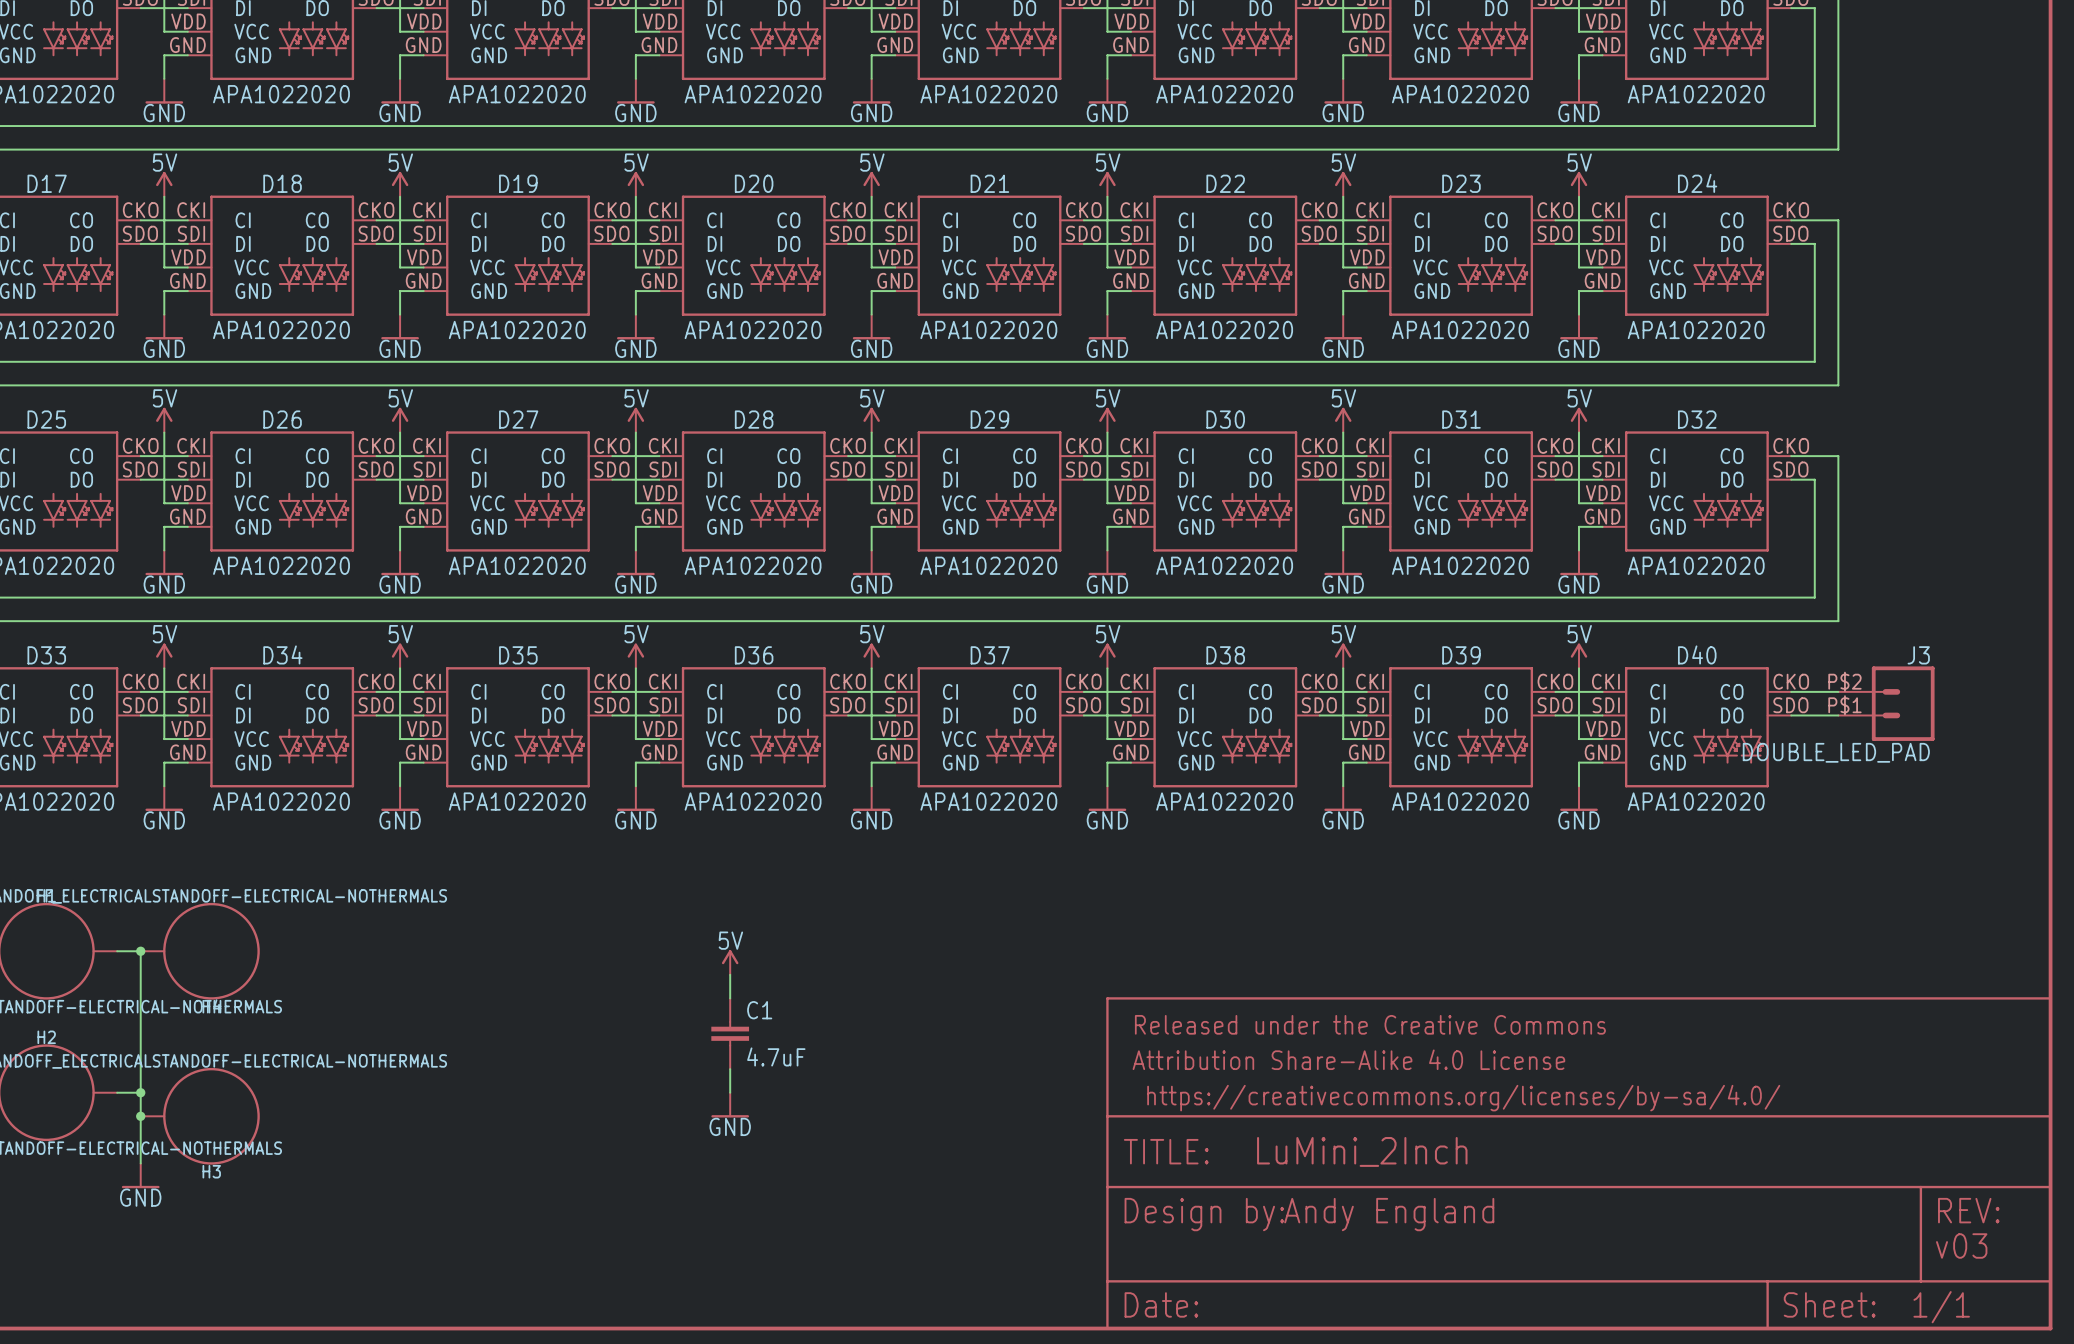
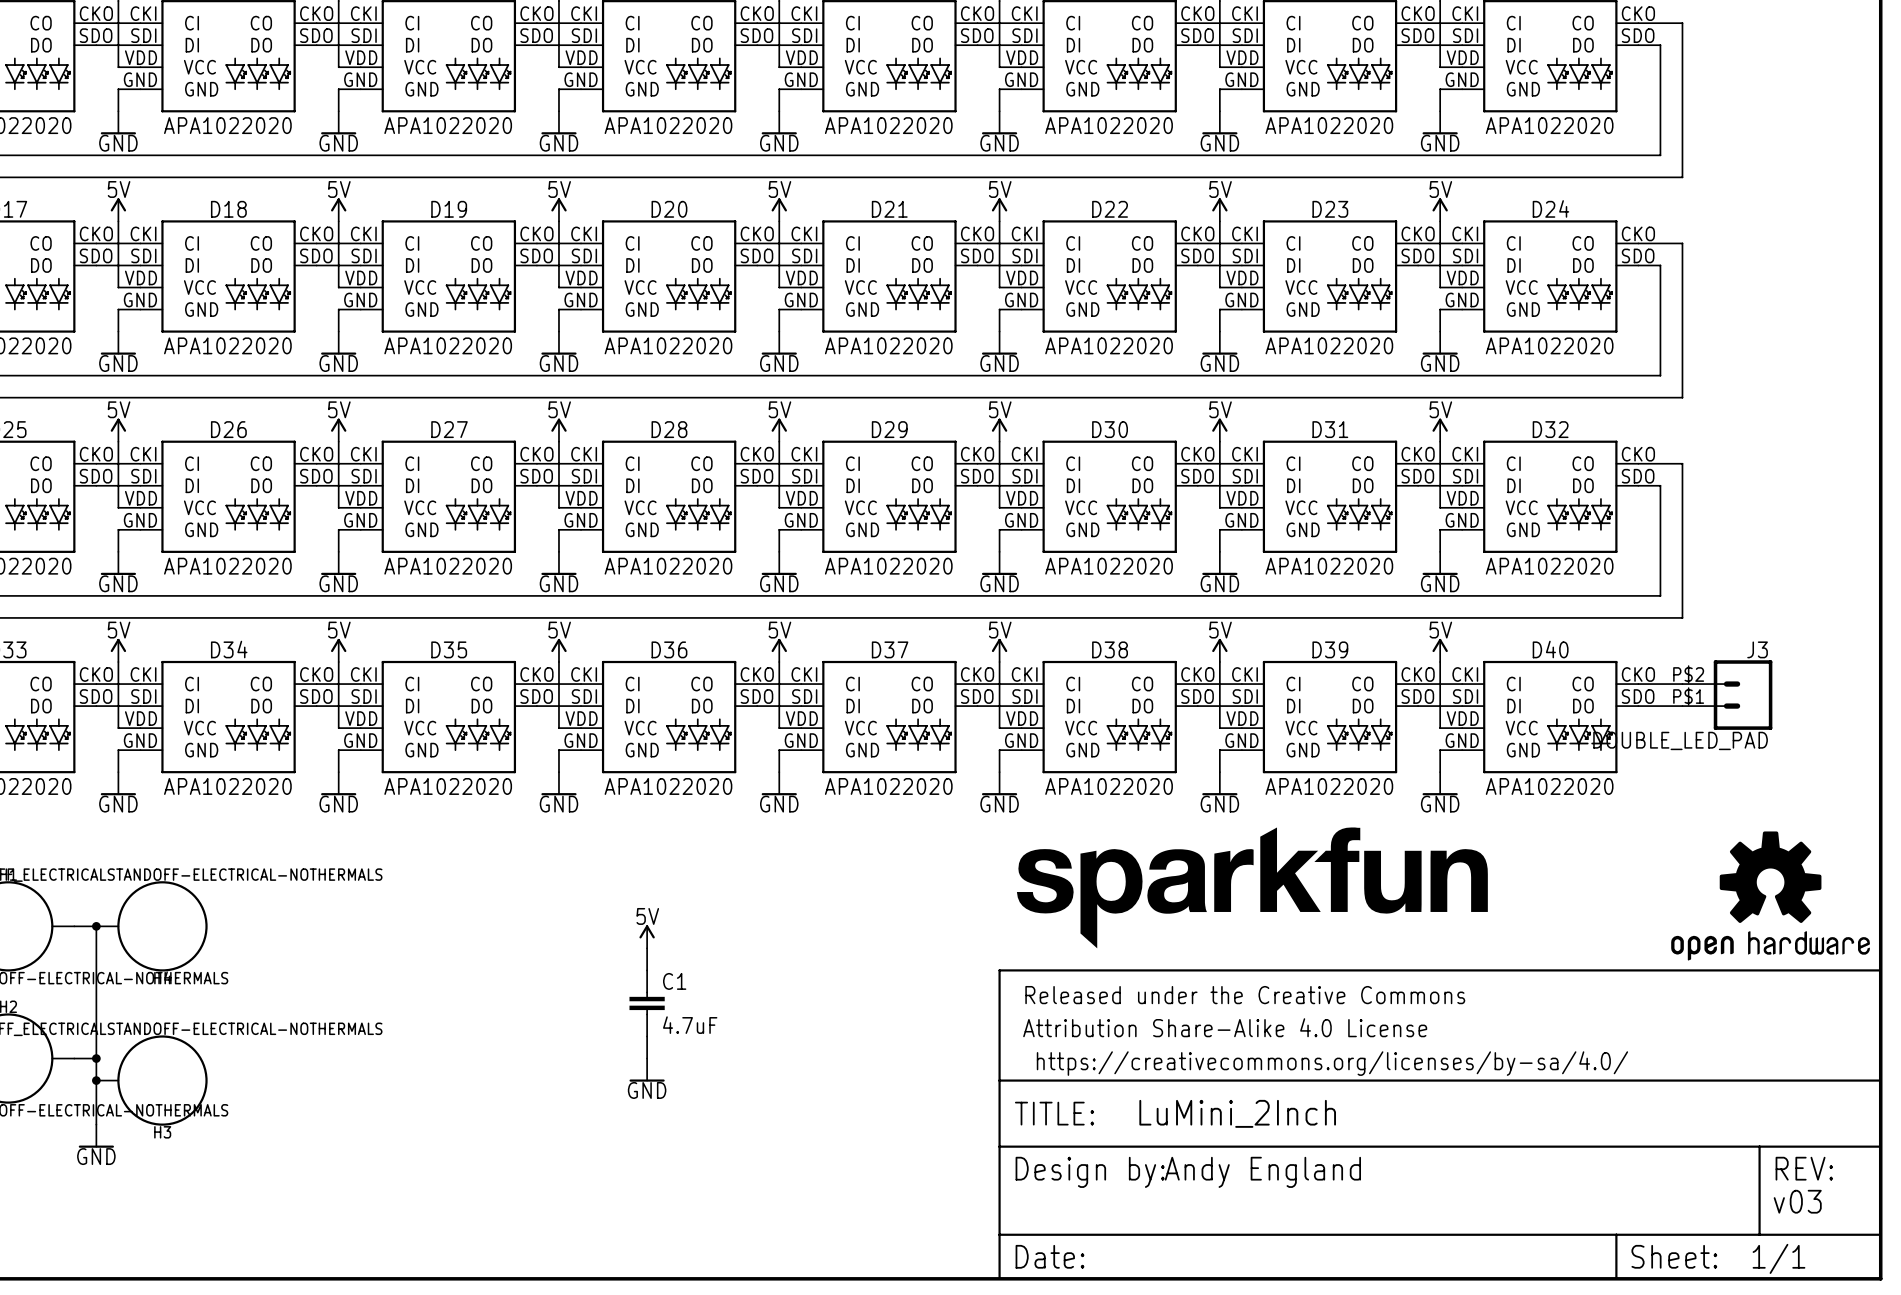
part: none -> (1252, 887)
part: none -> (1770, 895)

